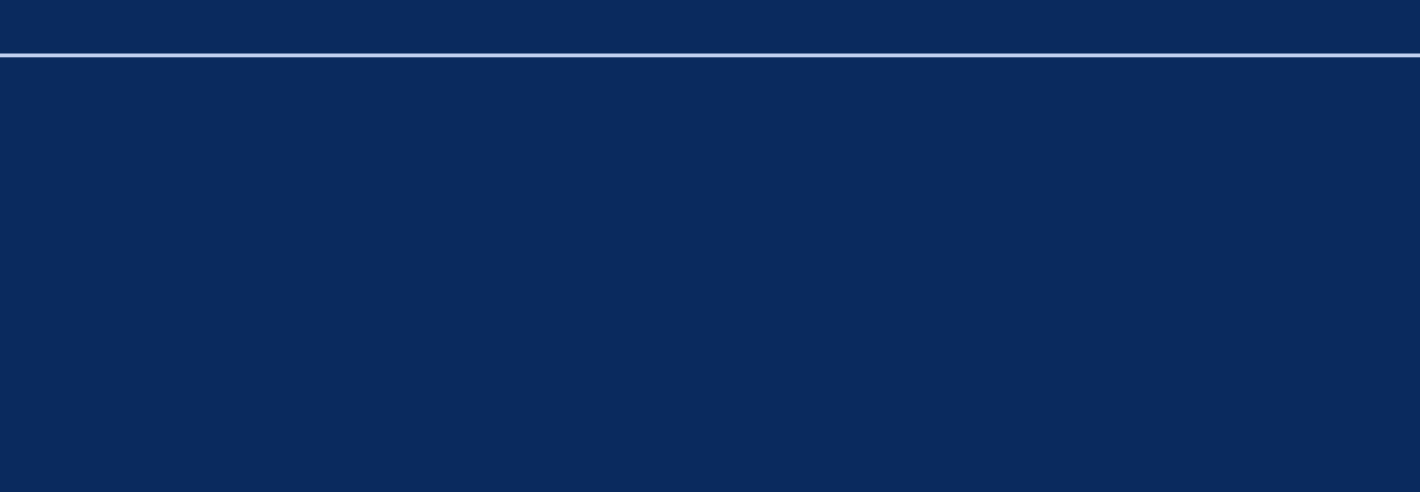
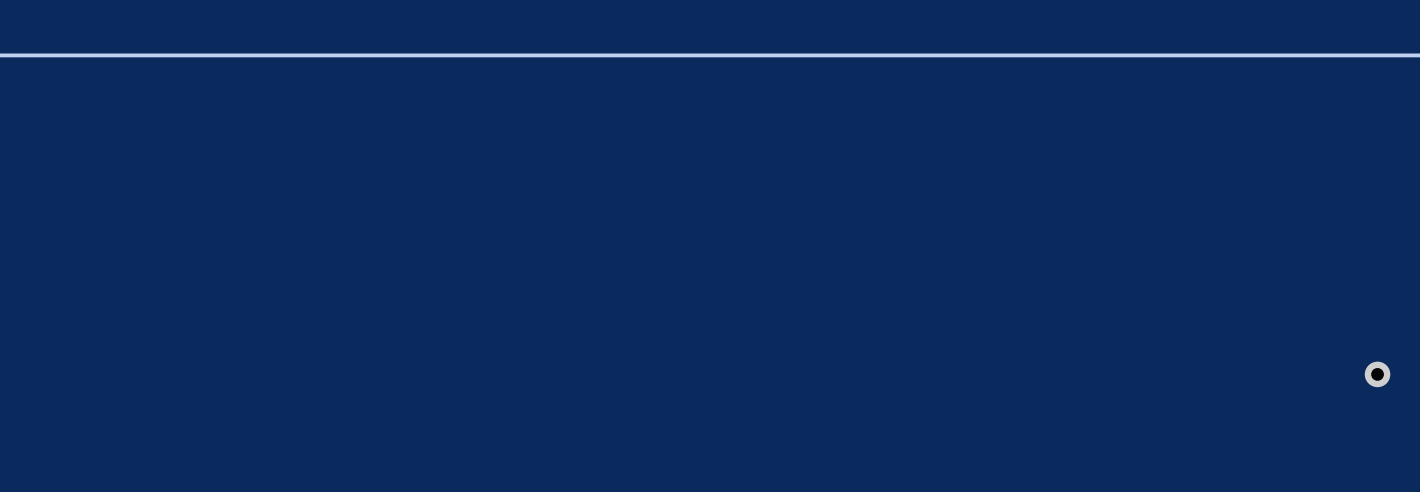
part: none -> (1377, 374)

